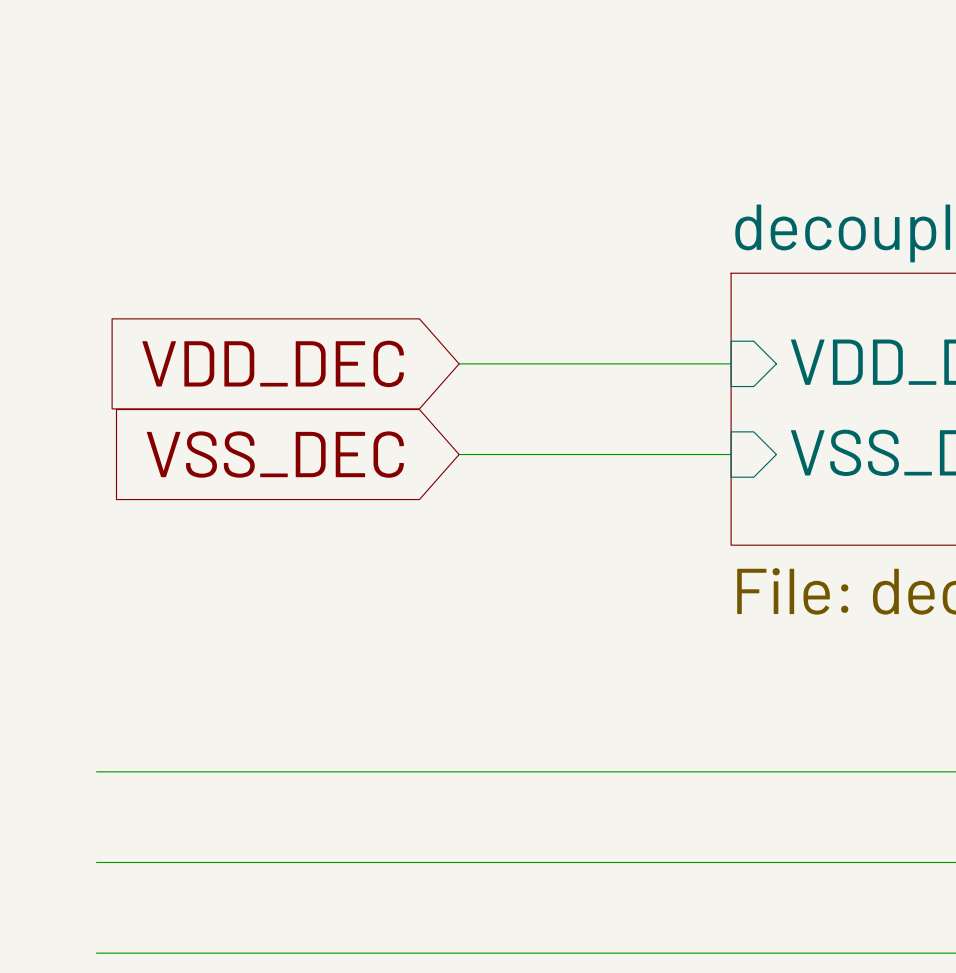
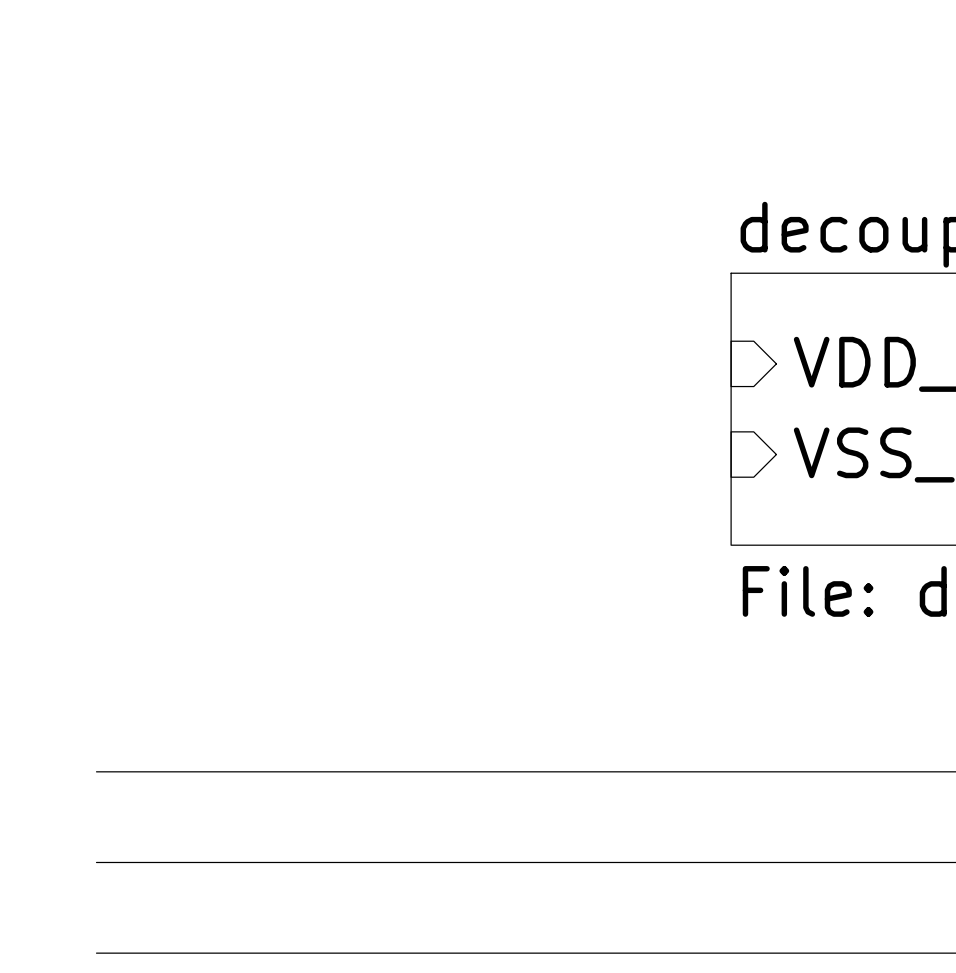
global label: VDD_DEC (273, 363) -> none
wire: (459, 363) (731, 363) -> none
global label: VSS_DEC (275, 454) -> none
wire: (459, 454) (731, 454) -> none

